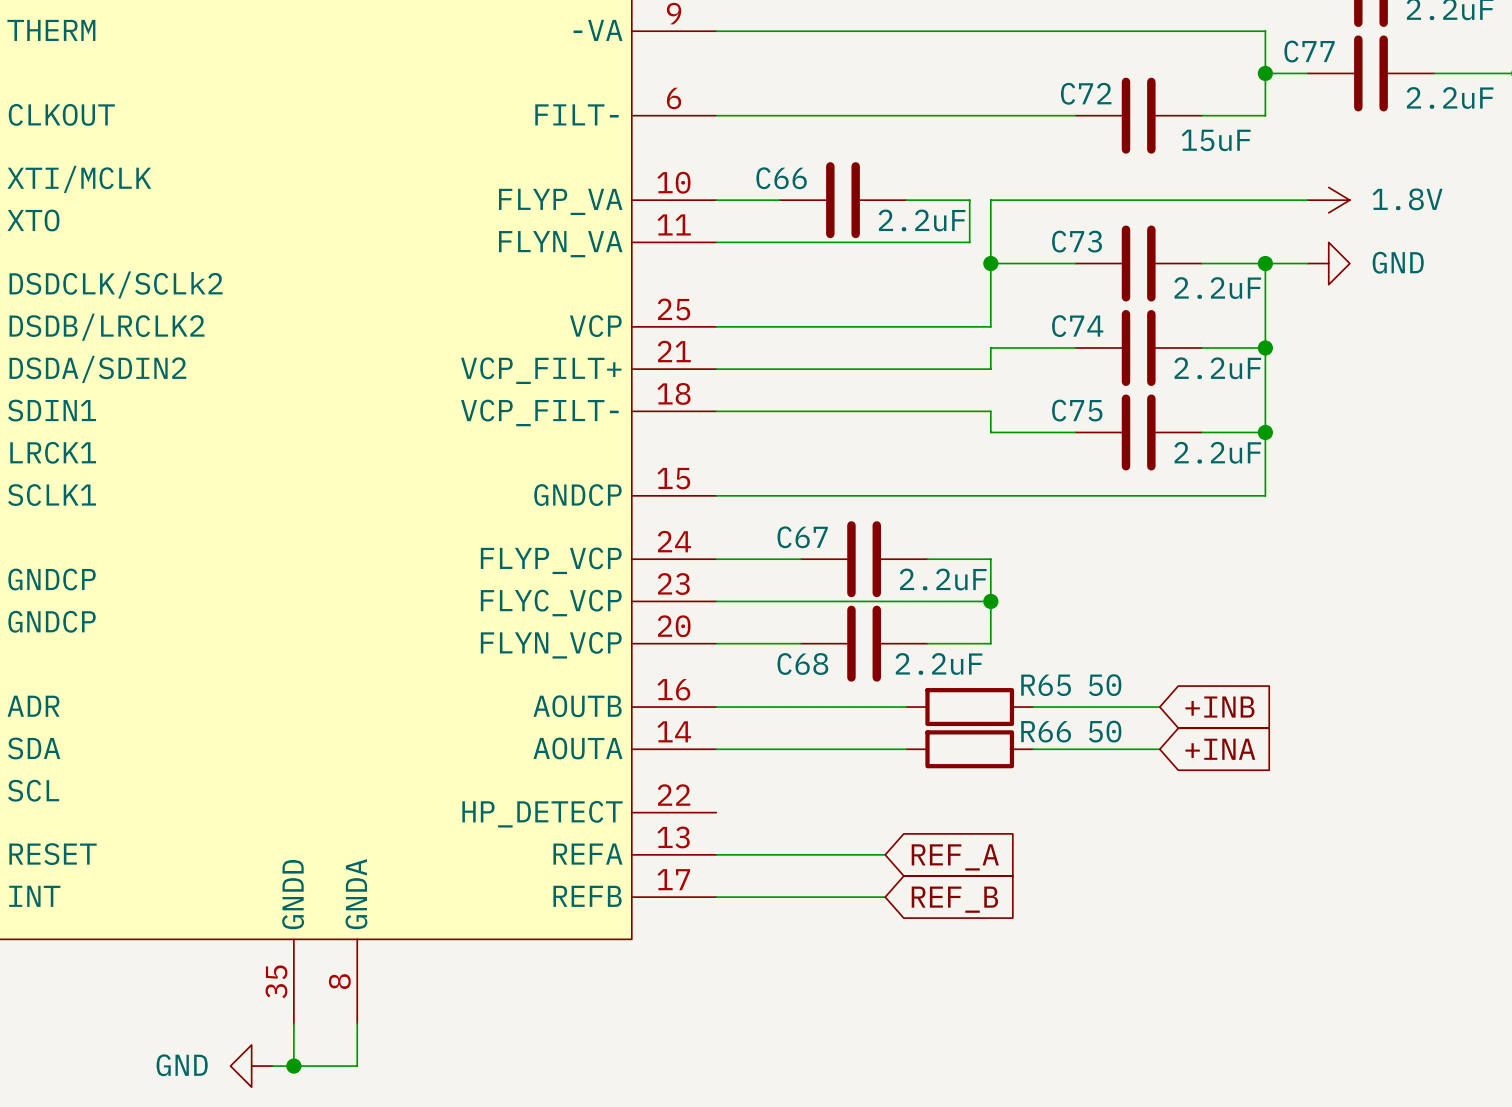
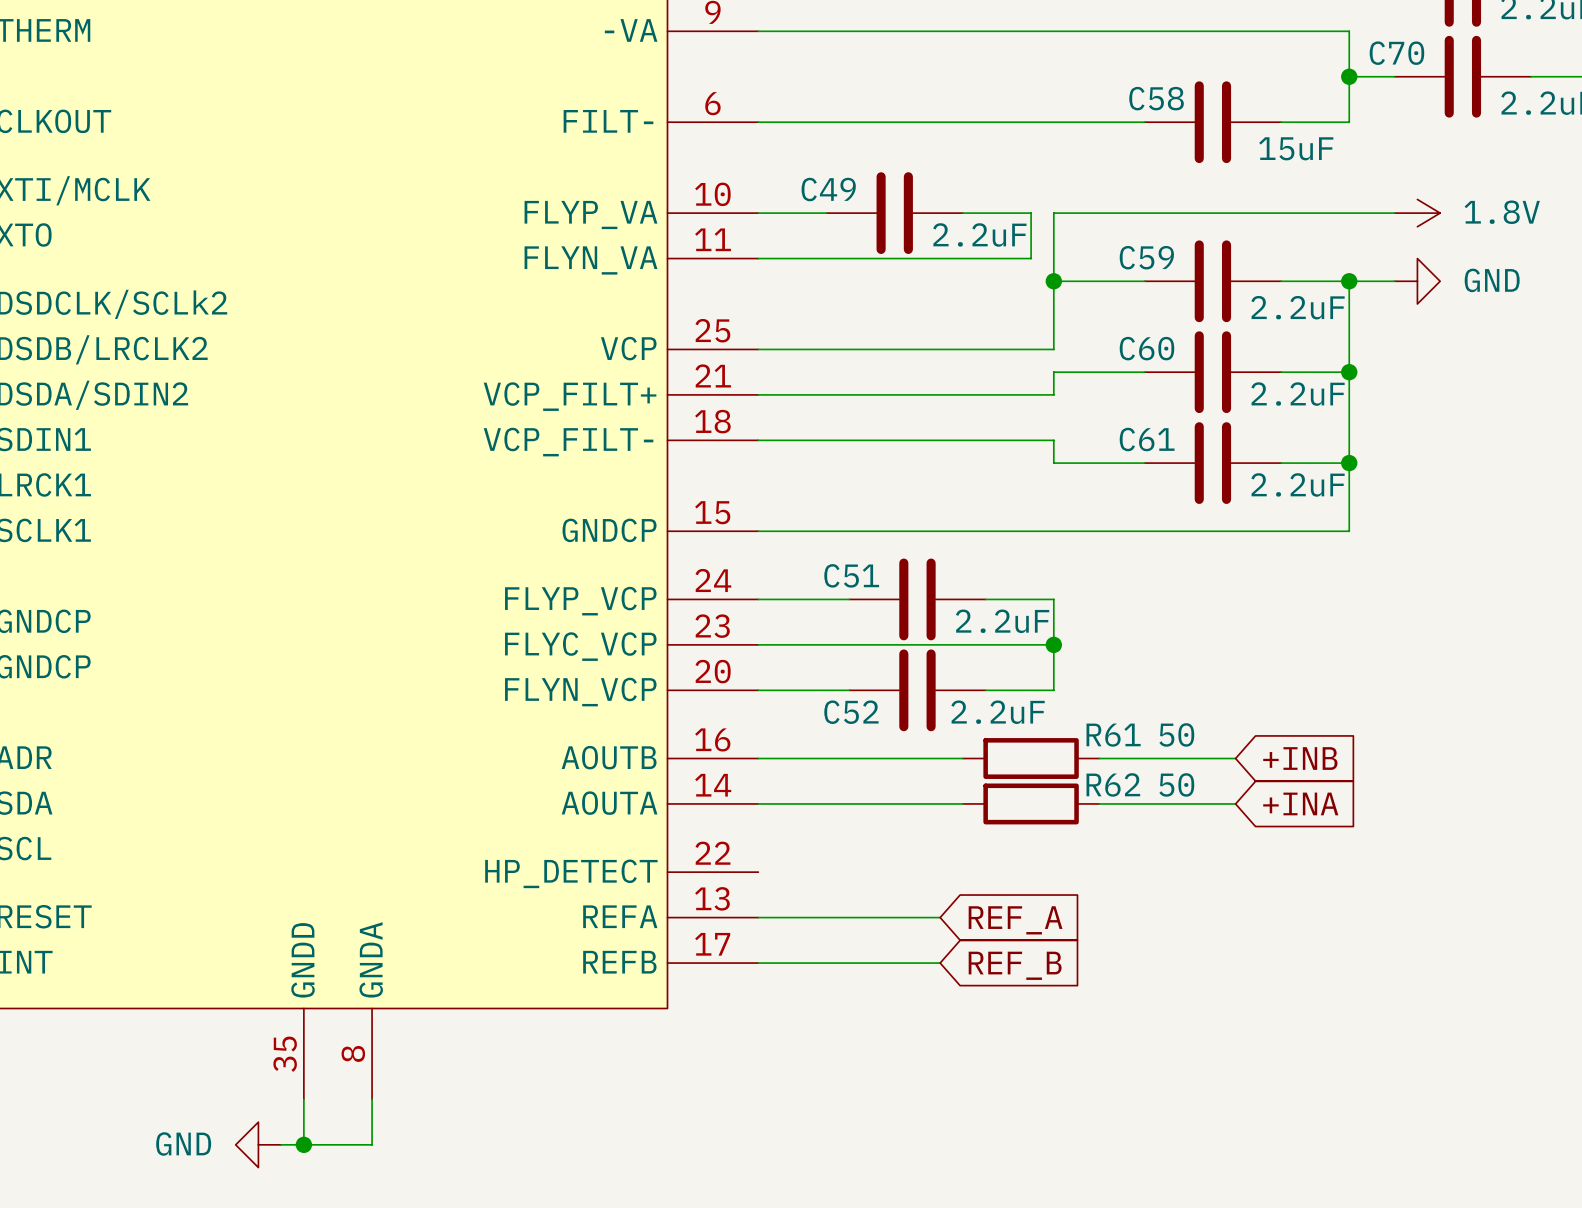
C77 name: C77 (1309, 51) -> C70 (1396, 53)
C72 name: C72 (1086, 93) -> C58 (1156, 98)
C66 name: C66 (781, 178) -> C49 (828, 189)
C73 name: C73 (1077, 241) -> C59 (1146, 257)
C74 name: C74 (1077, 326) -> C60 (1146, 348)
C75 name: C75 (1077, 410) -> C61 (1147, 439)
C67 name: C67 (802, 537) -> C51 (851, 575)
C68 name: C68 (802, 664) -> C52 (851, 712)
R65 name: R65 (1046, 685) -> R61 (1113, 735)
R66 name: R66 (1046, 731) -> R62 (1113, 784)

